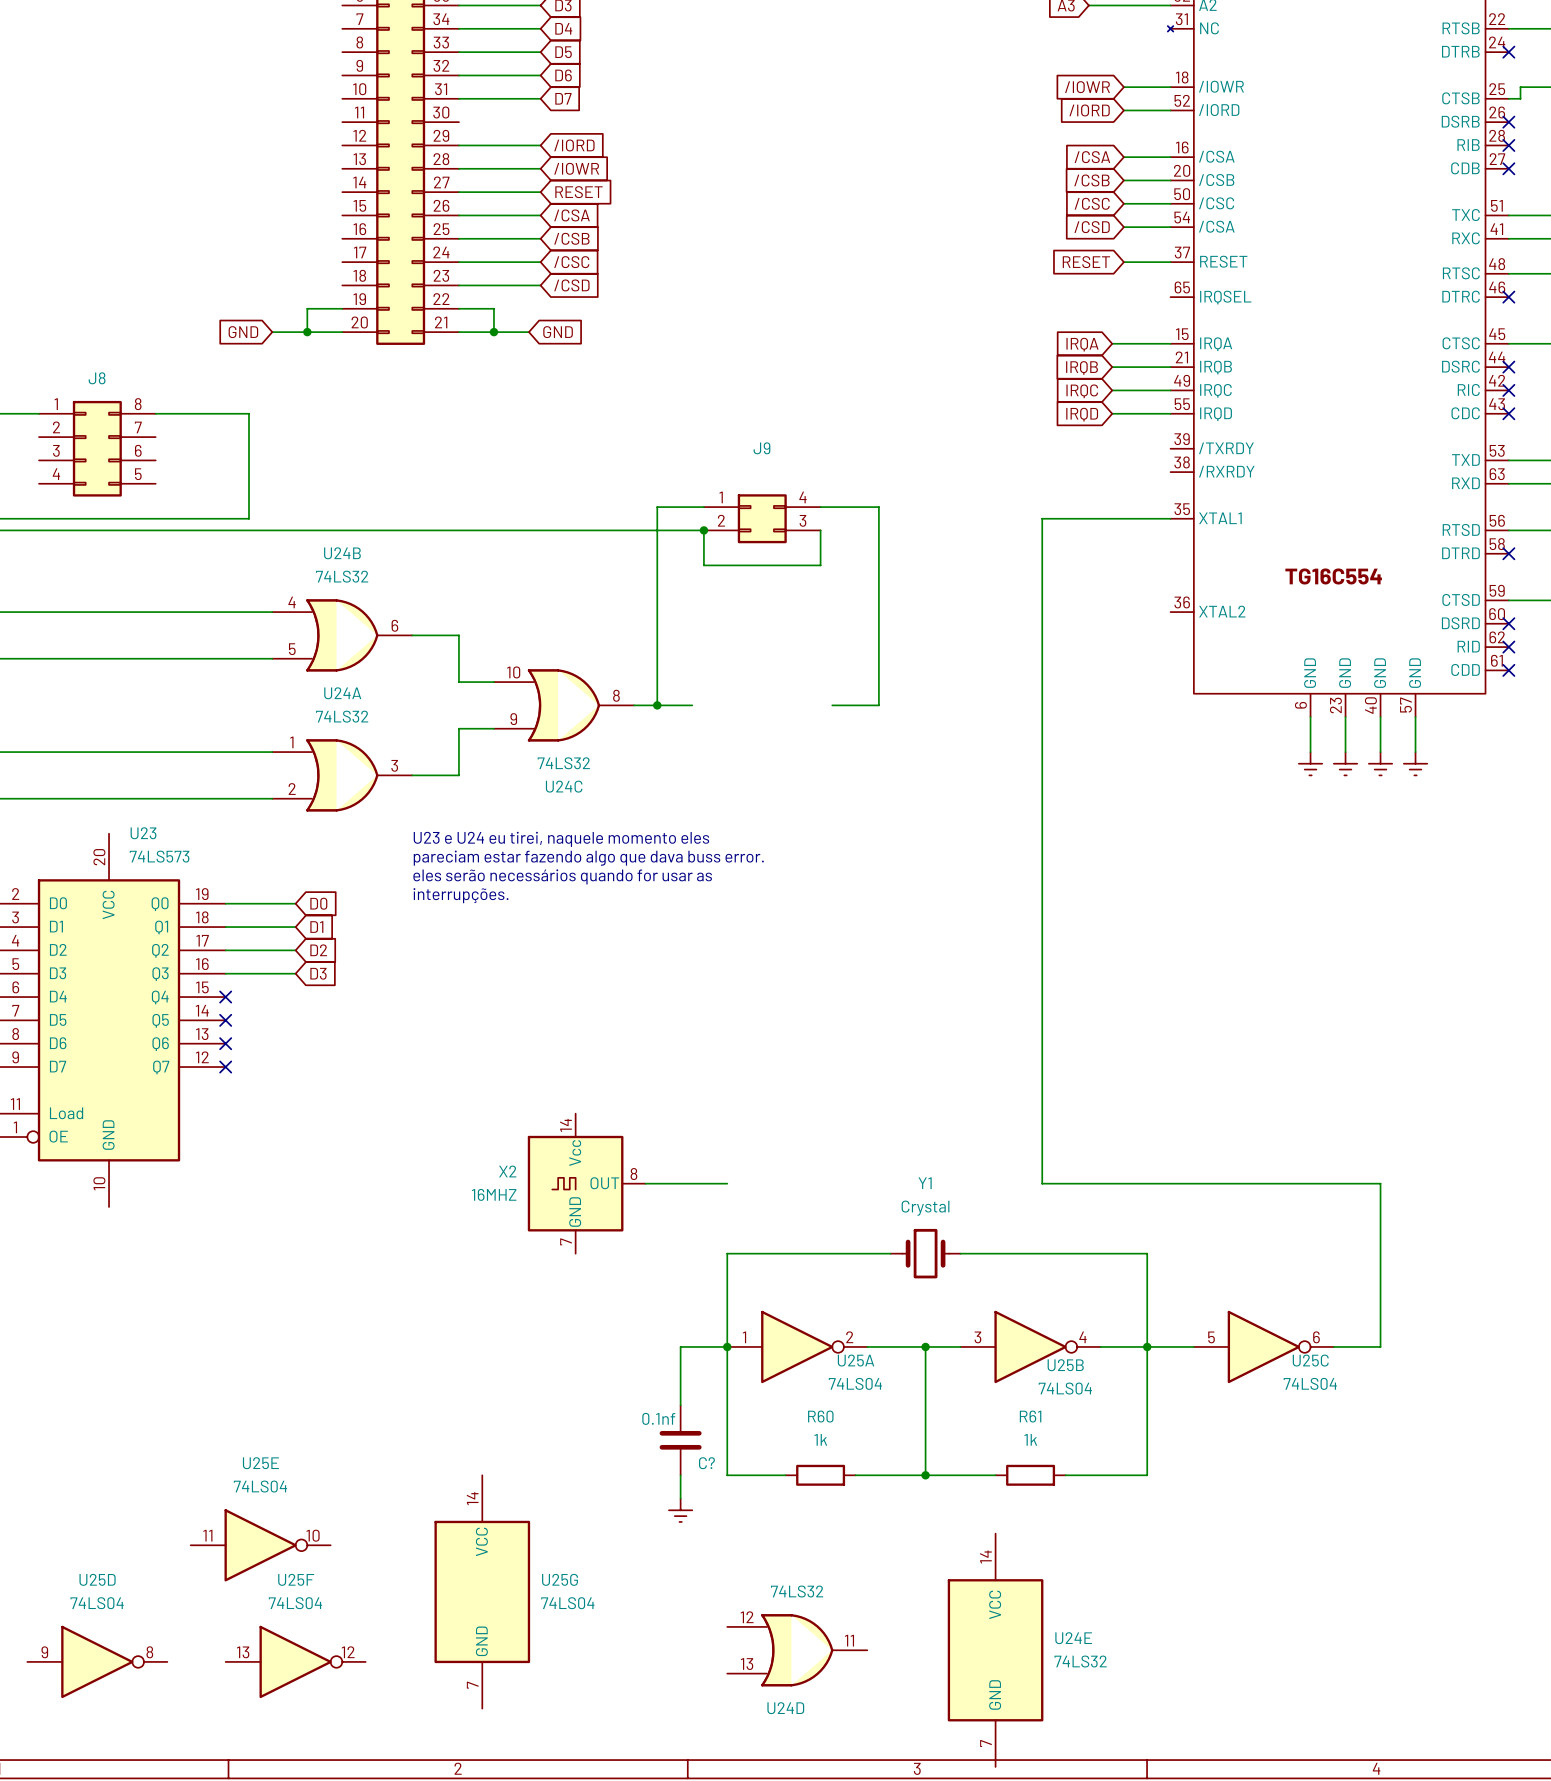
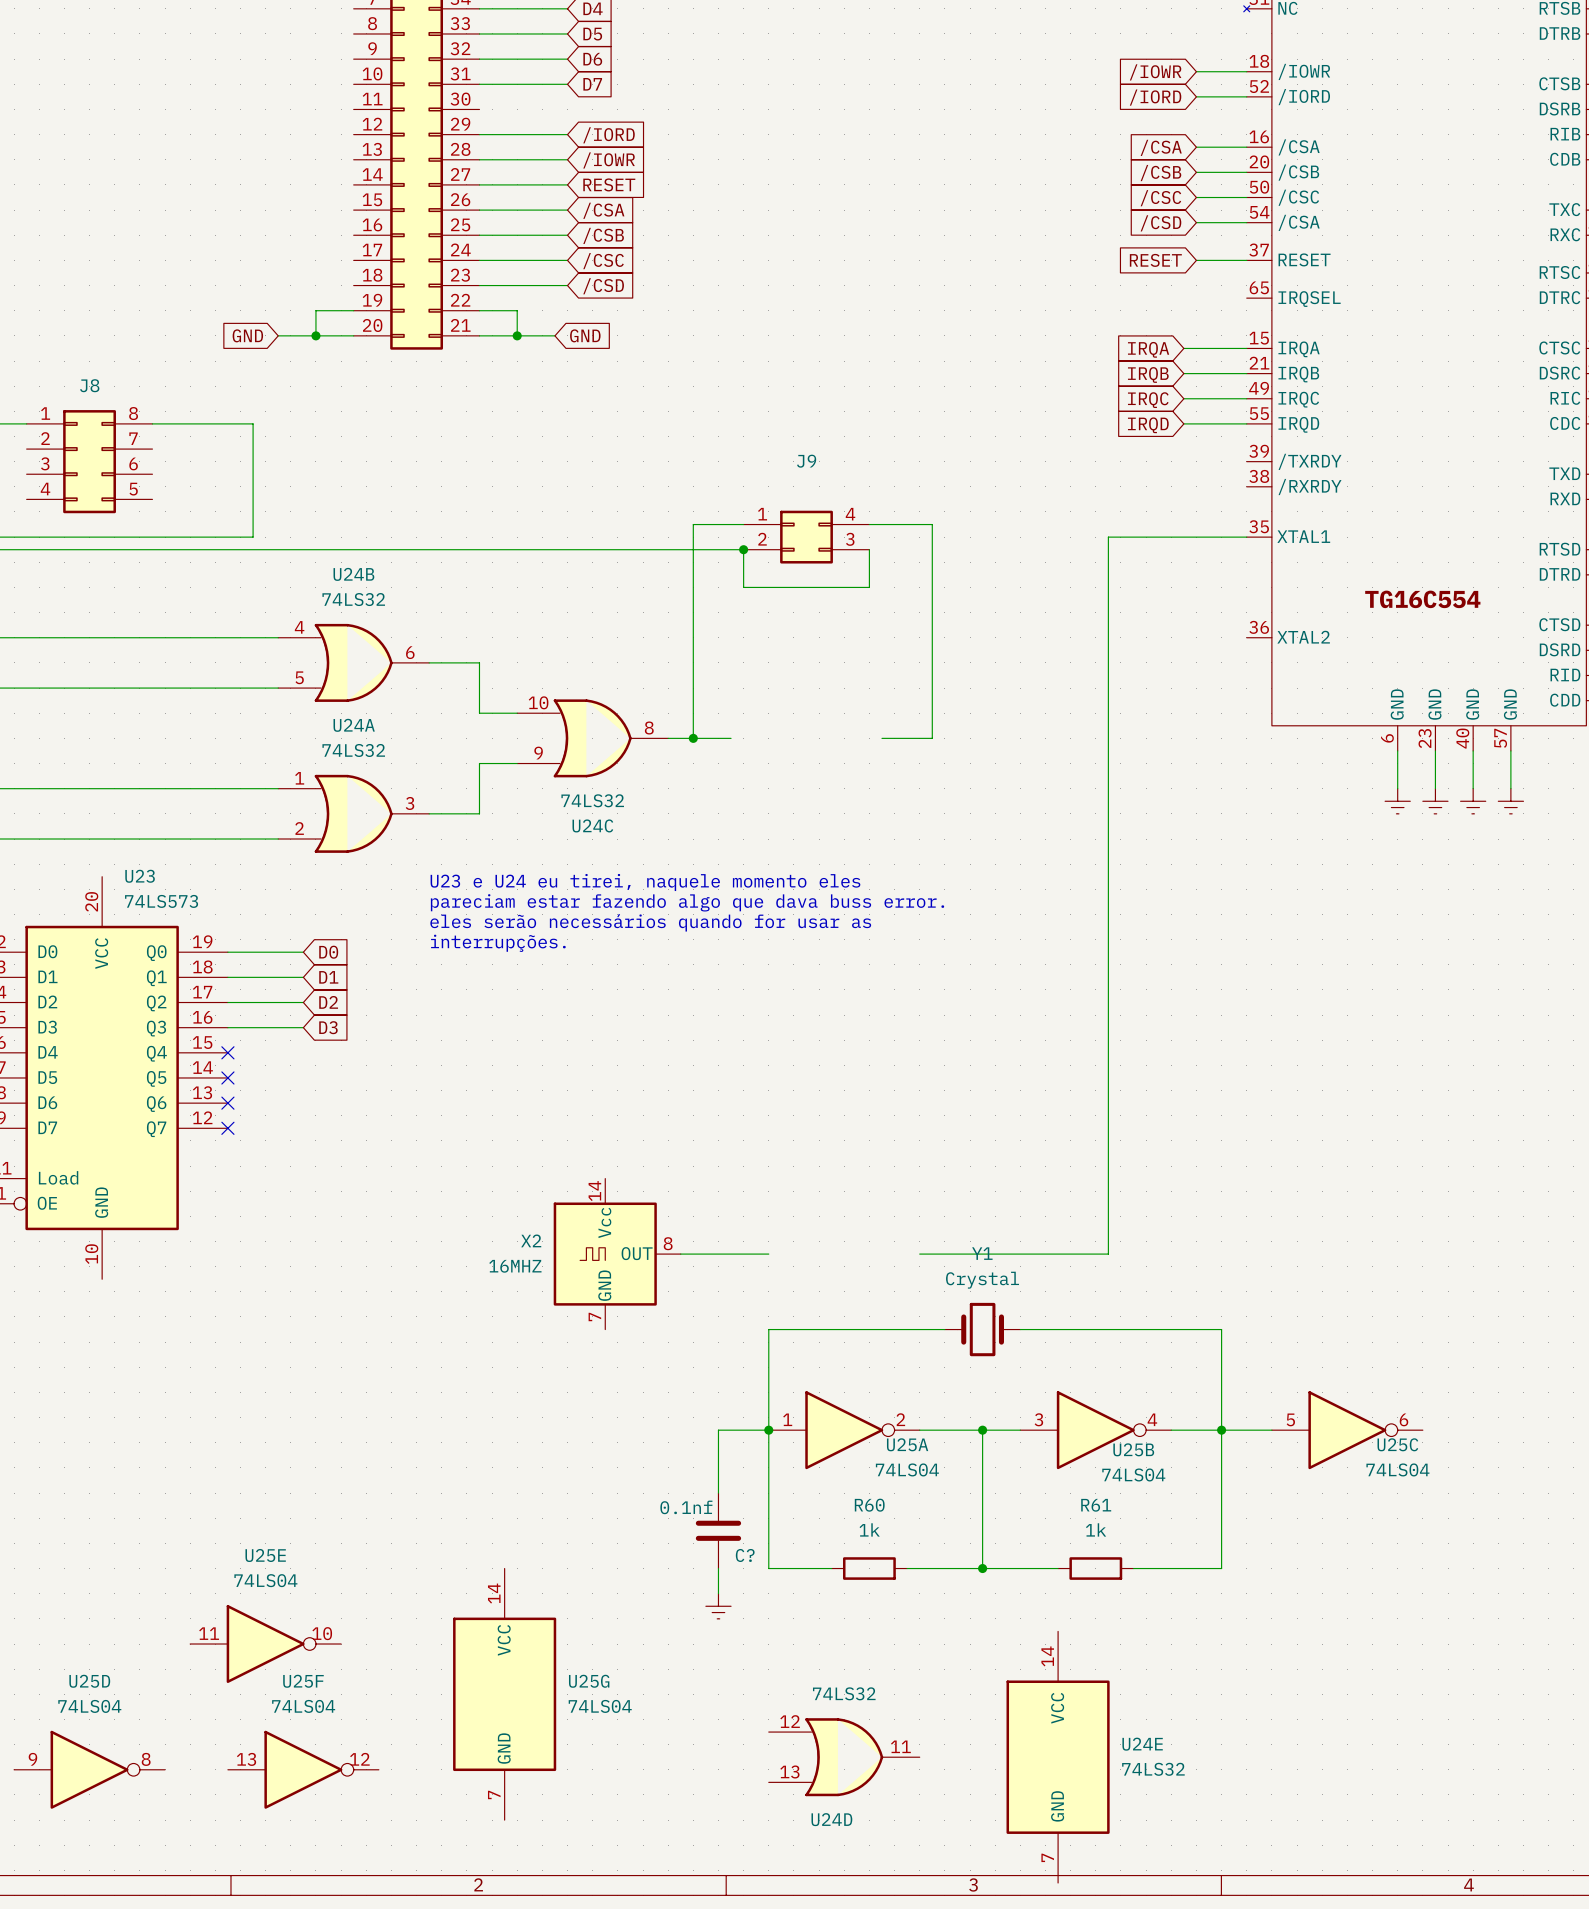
wire: (1042, 1183) (1380, 1183) (1380, 1346) (1333, 1346) -> (1108, 1254) (919, 1254)

